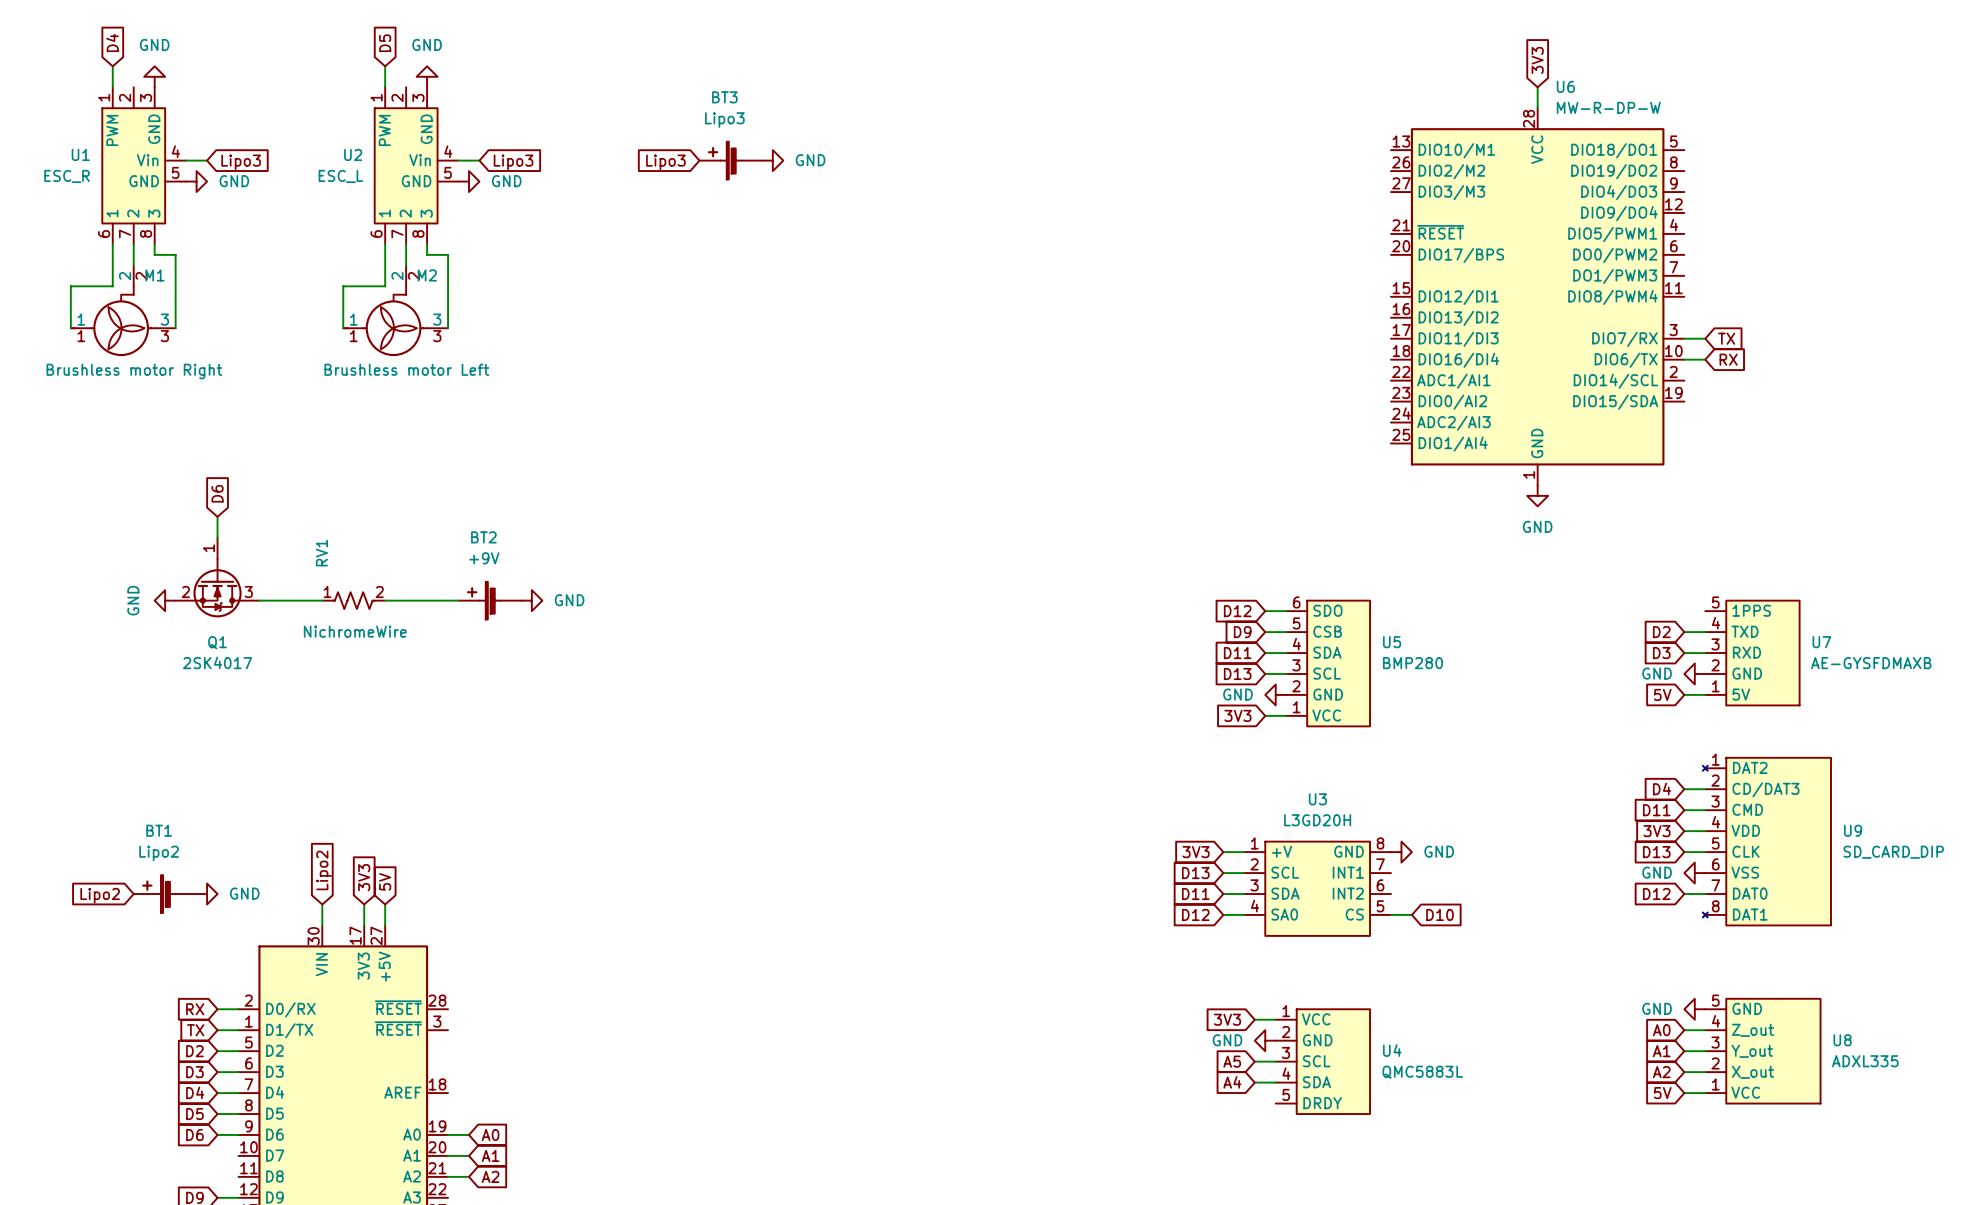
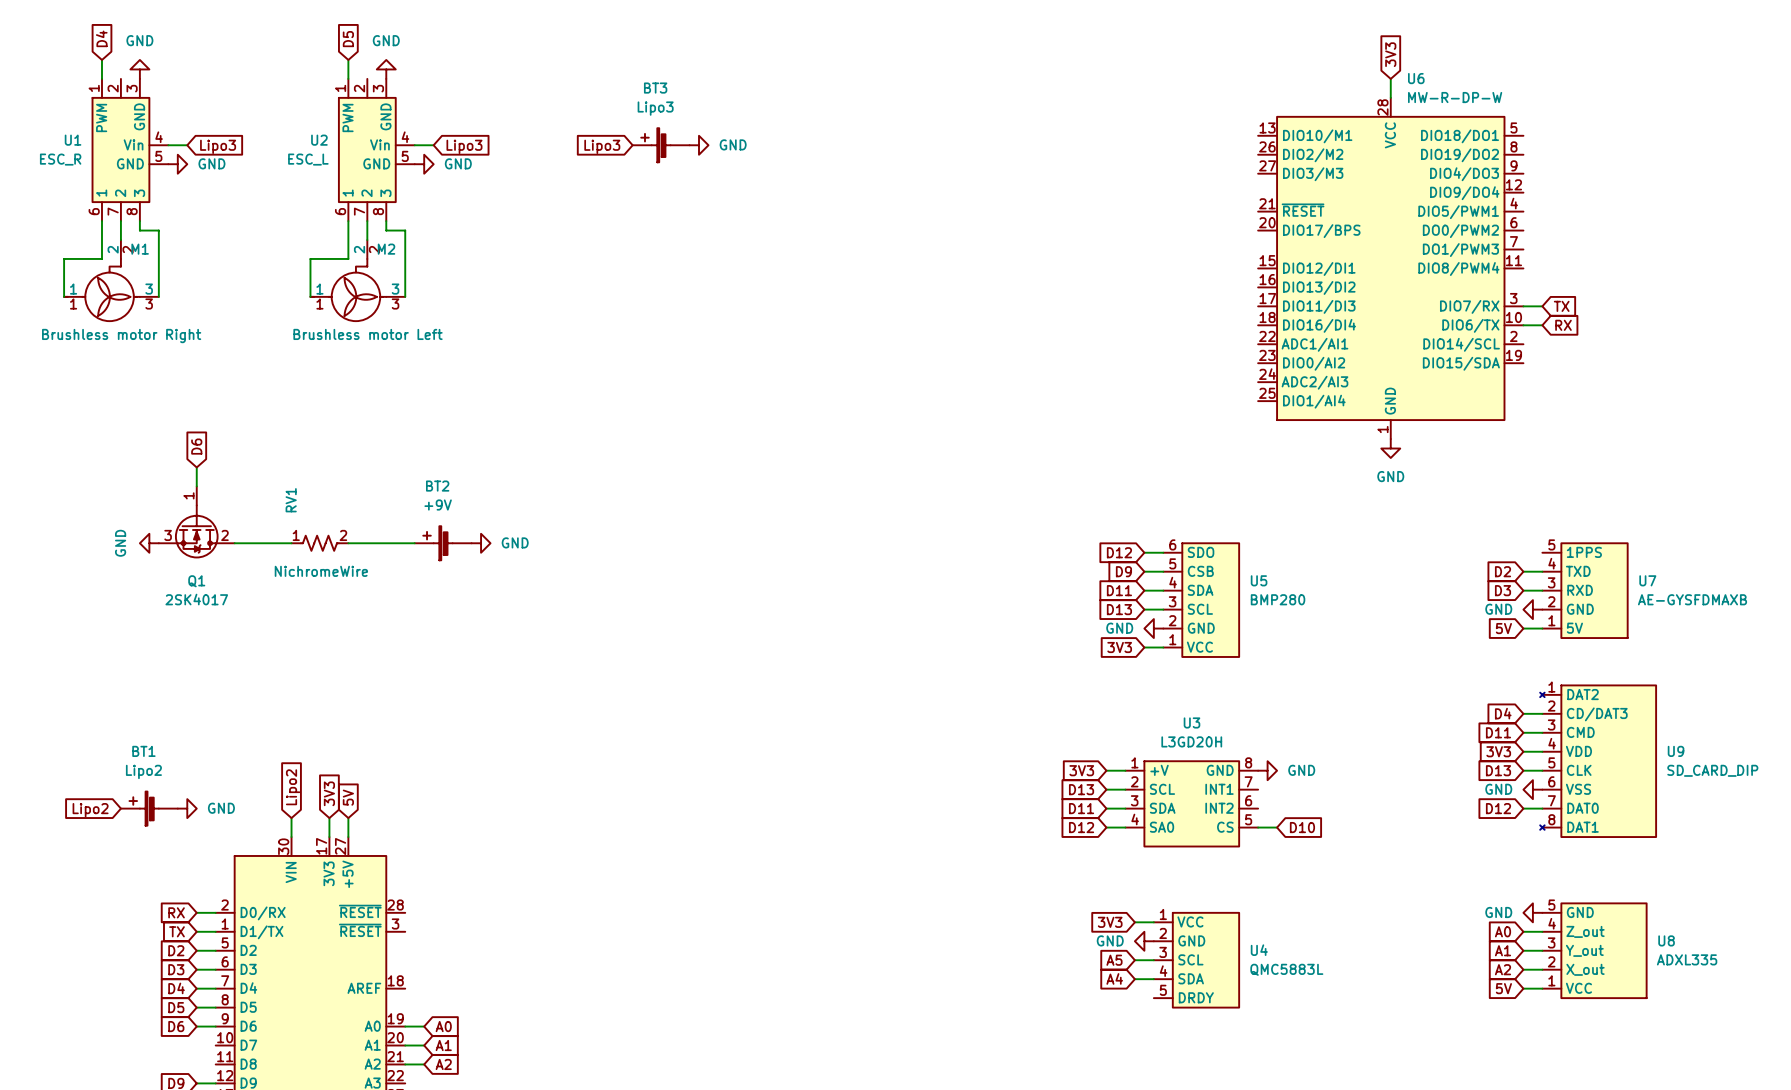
Q1 pin number: 2 (185, 592) -> 3 (168, 535)
Q1 pin number: 3 (248, 592) -> 2 (224, 535)

